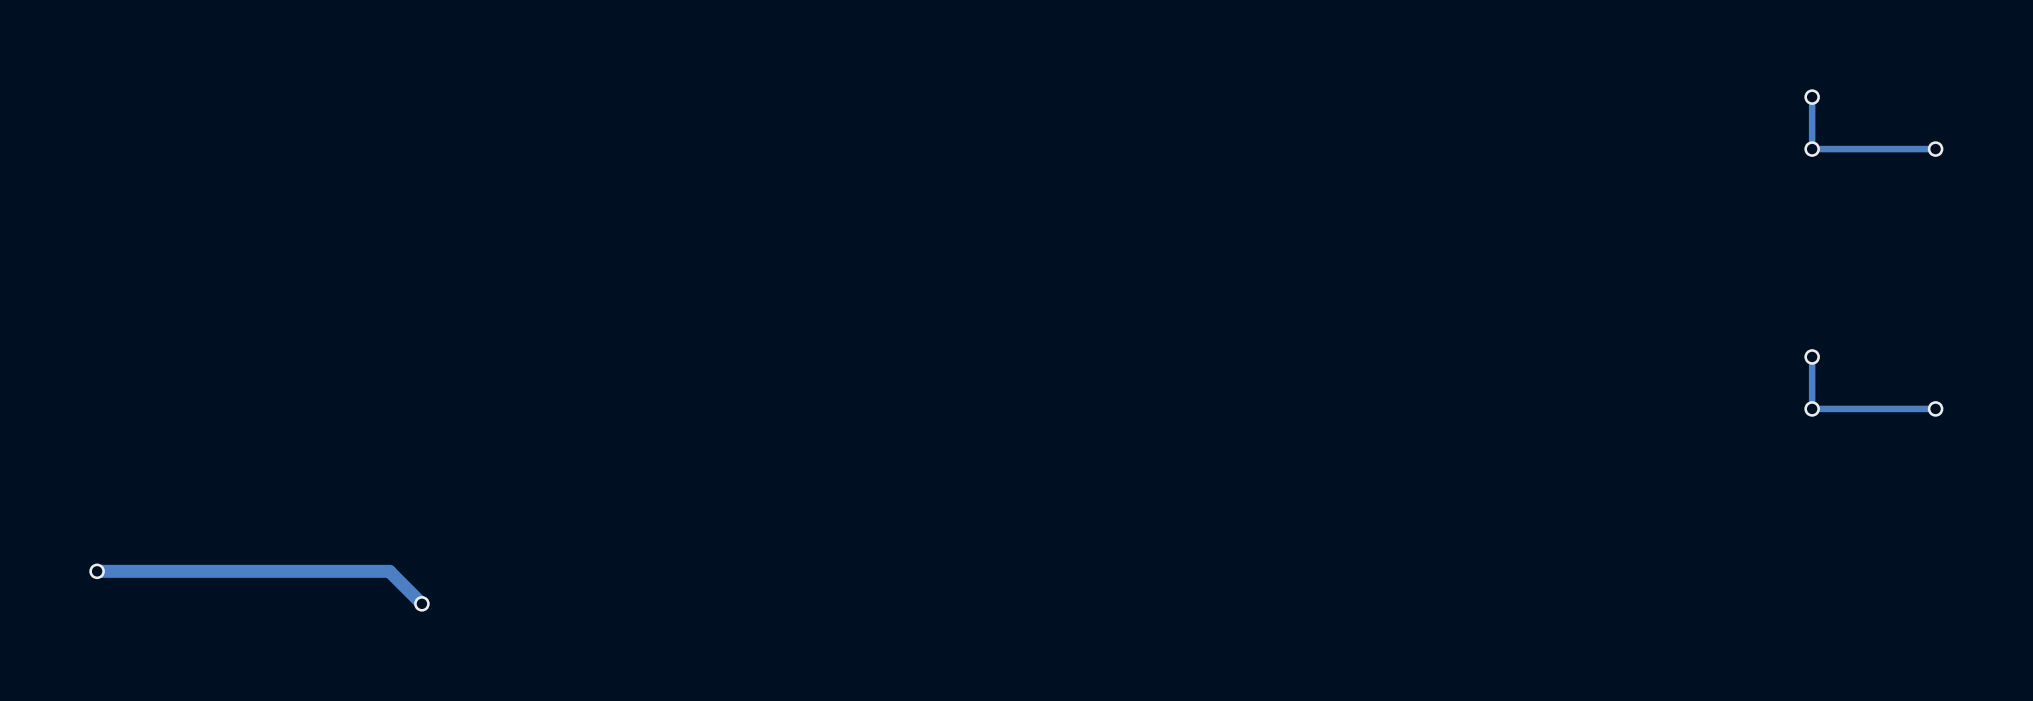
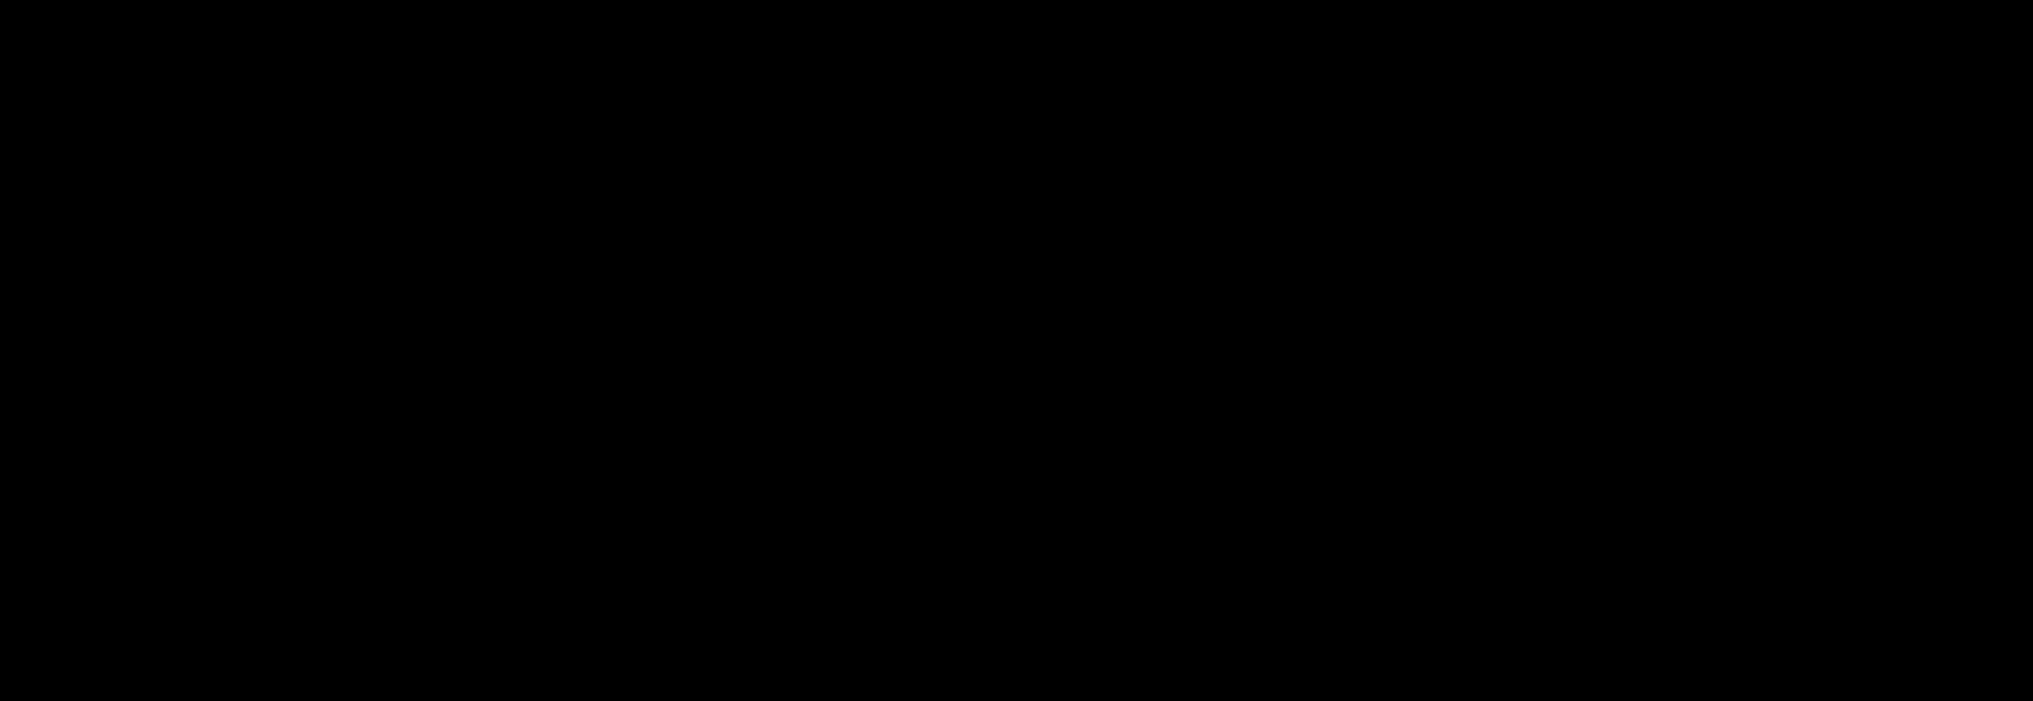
track: (1812, 97) (1812, 149) (1935, 149) -> none
via: (1812, 97) -> none
via: (1812, 149) -> none
via: (1935, 149) -> none
track: (1812, 356) (1812, 408) (1935, 408) -> none
via: (1812, 356) -> none
via: (1812, 408) -> none
via: (1935, 408) -> none
track: (97, 571) (389, 571) (421, 603) -> none
via: (97, 571) -> none
via: (421, 603) -> none

